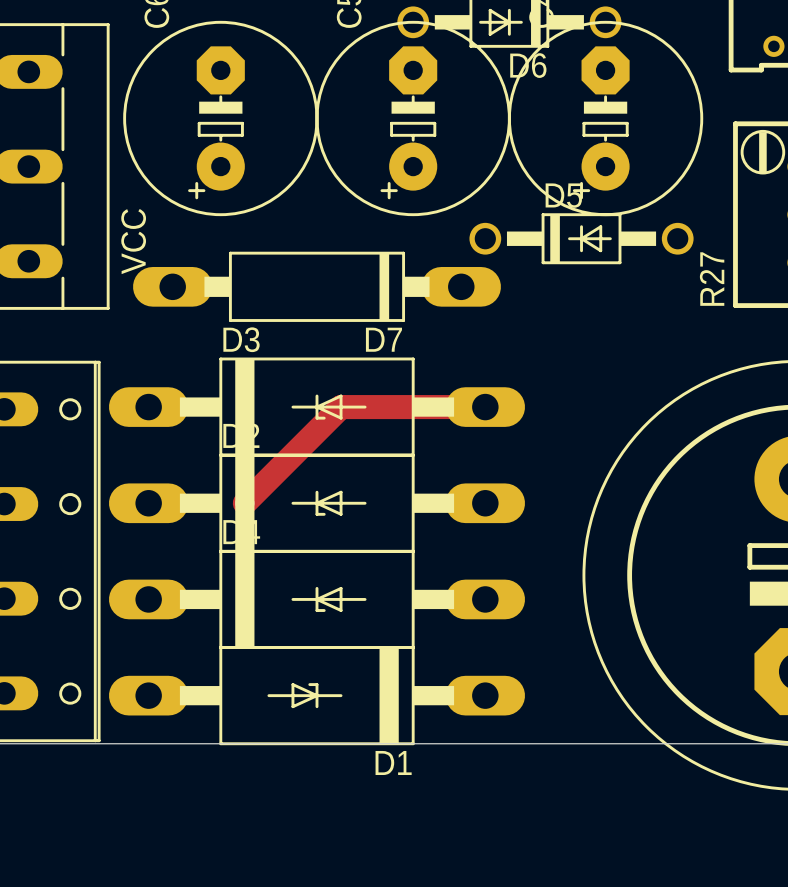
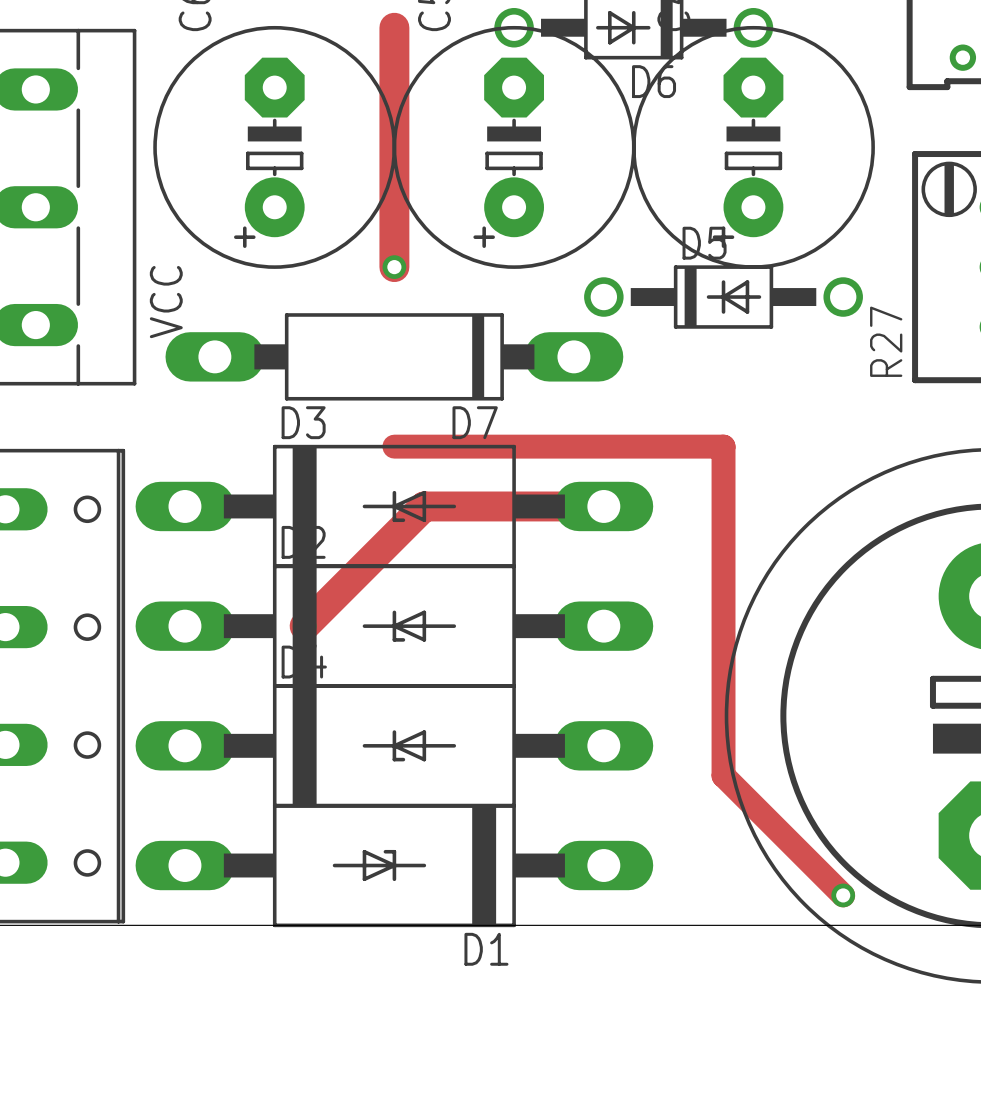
track: none -> (394, 27) (394, 267)
via: none -> (394, 267)
track: none -> (394, 446) (723, 446) (723, 775) (843, 895)
via: none -> (843, 895)

